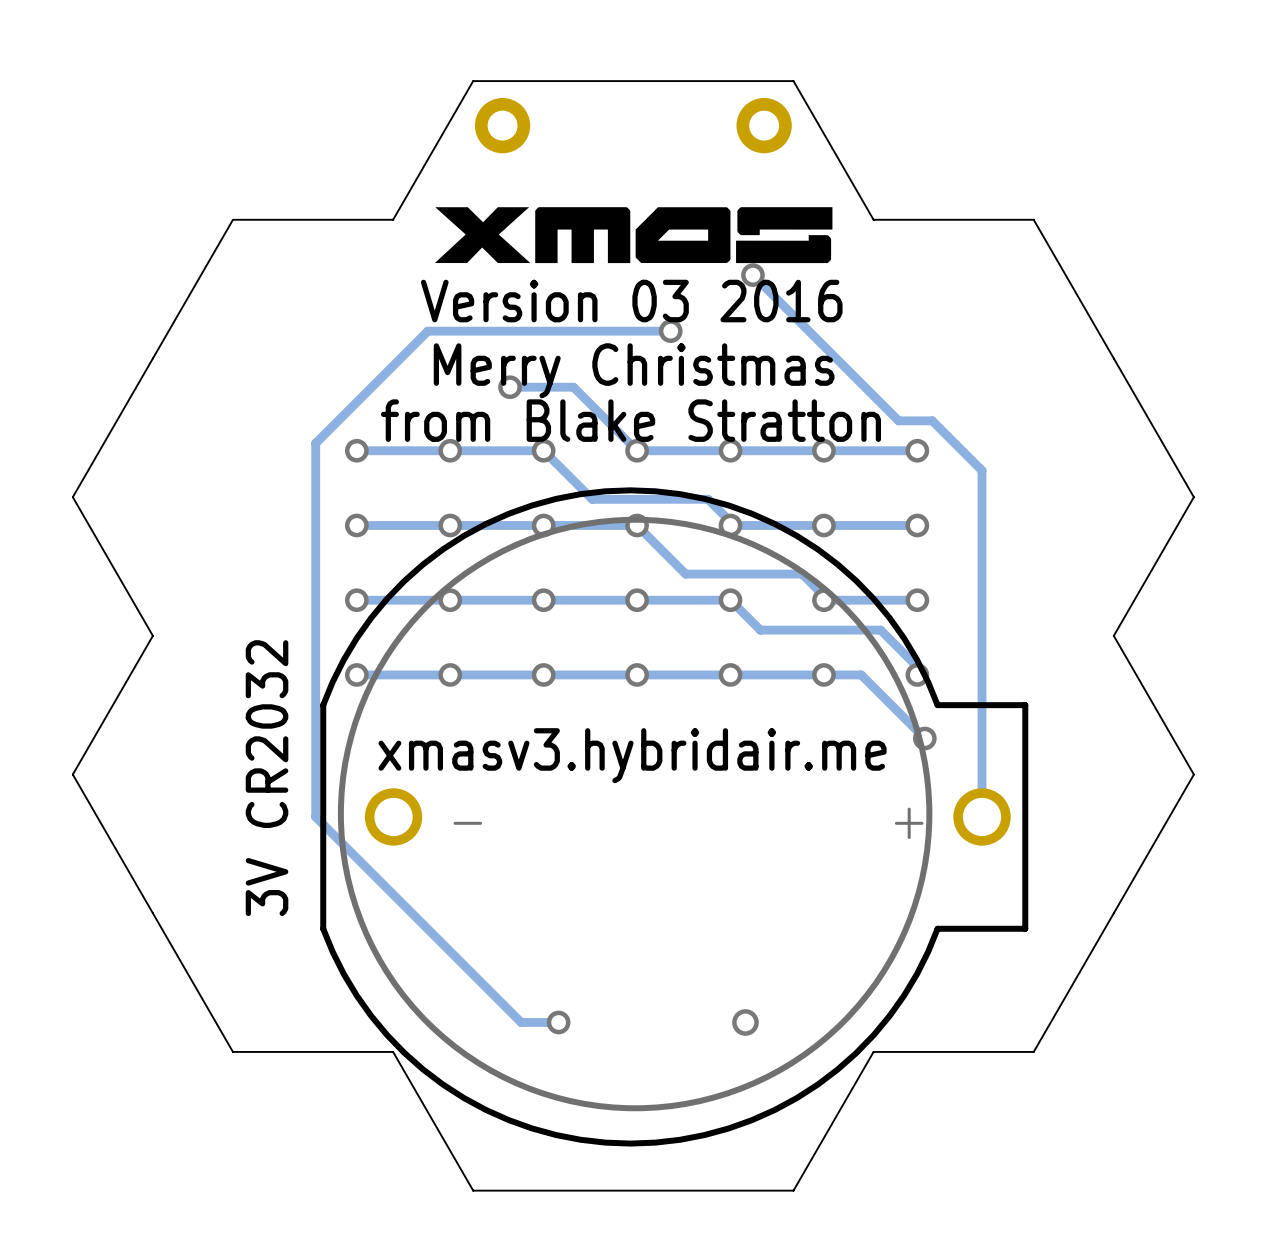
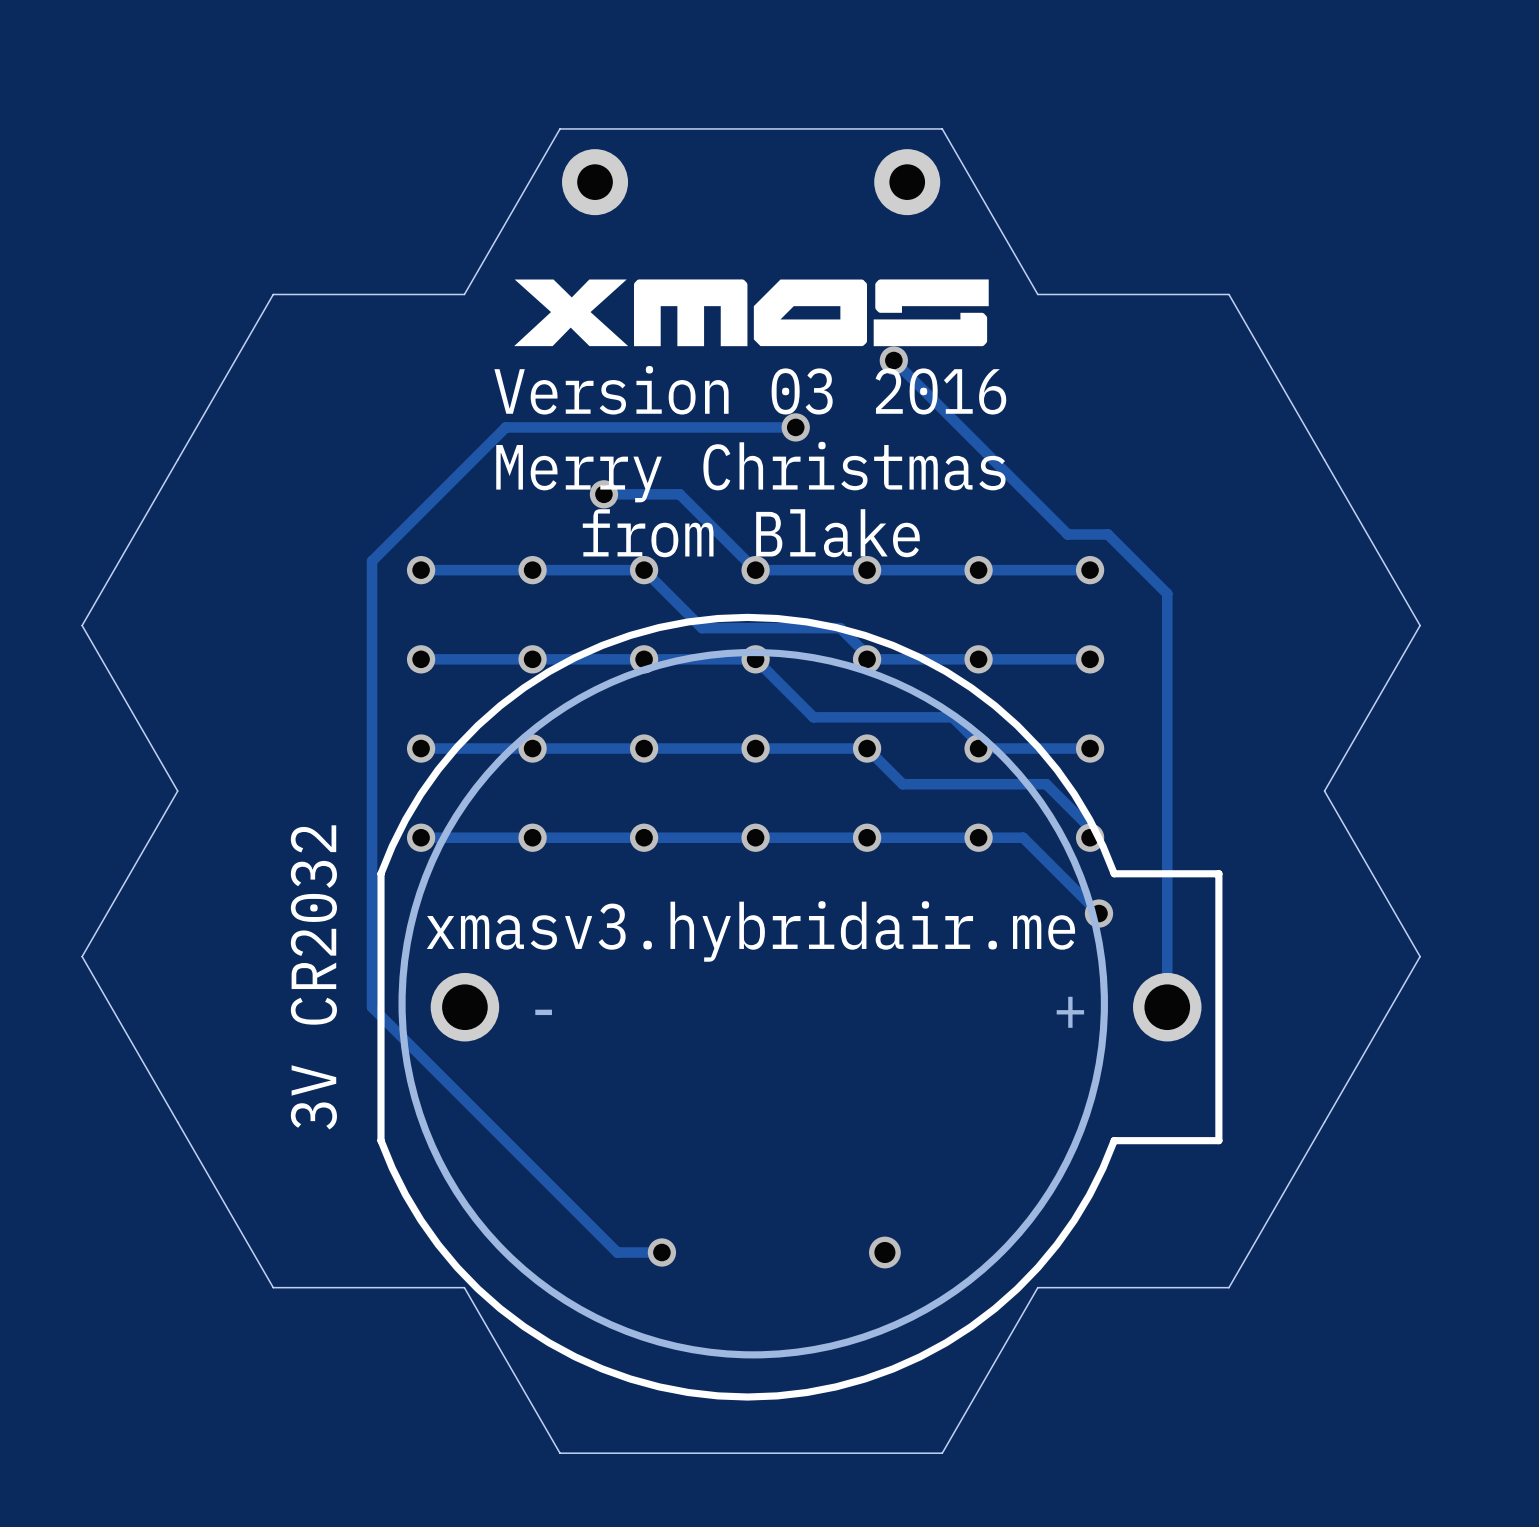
text: from Blake Stratton (630, 420) -> from Blake (751, 533)

